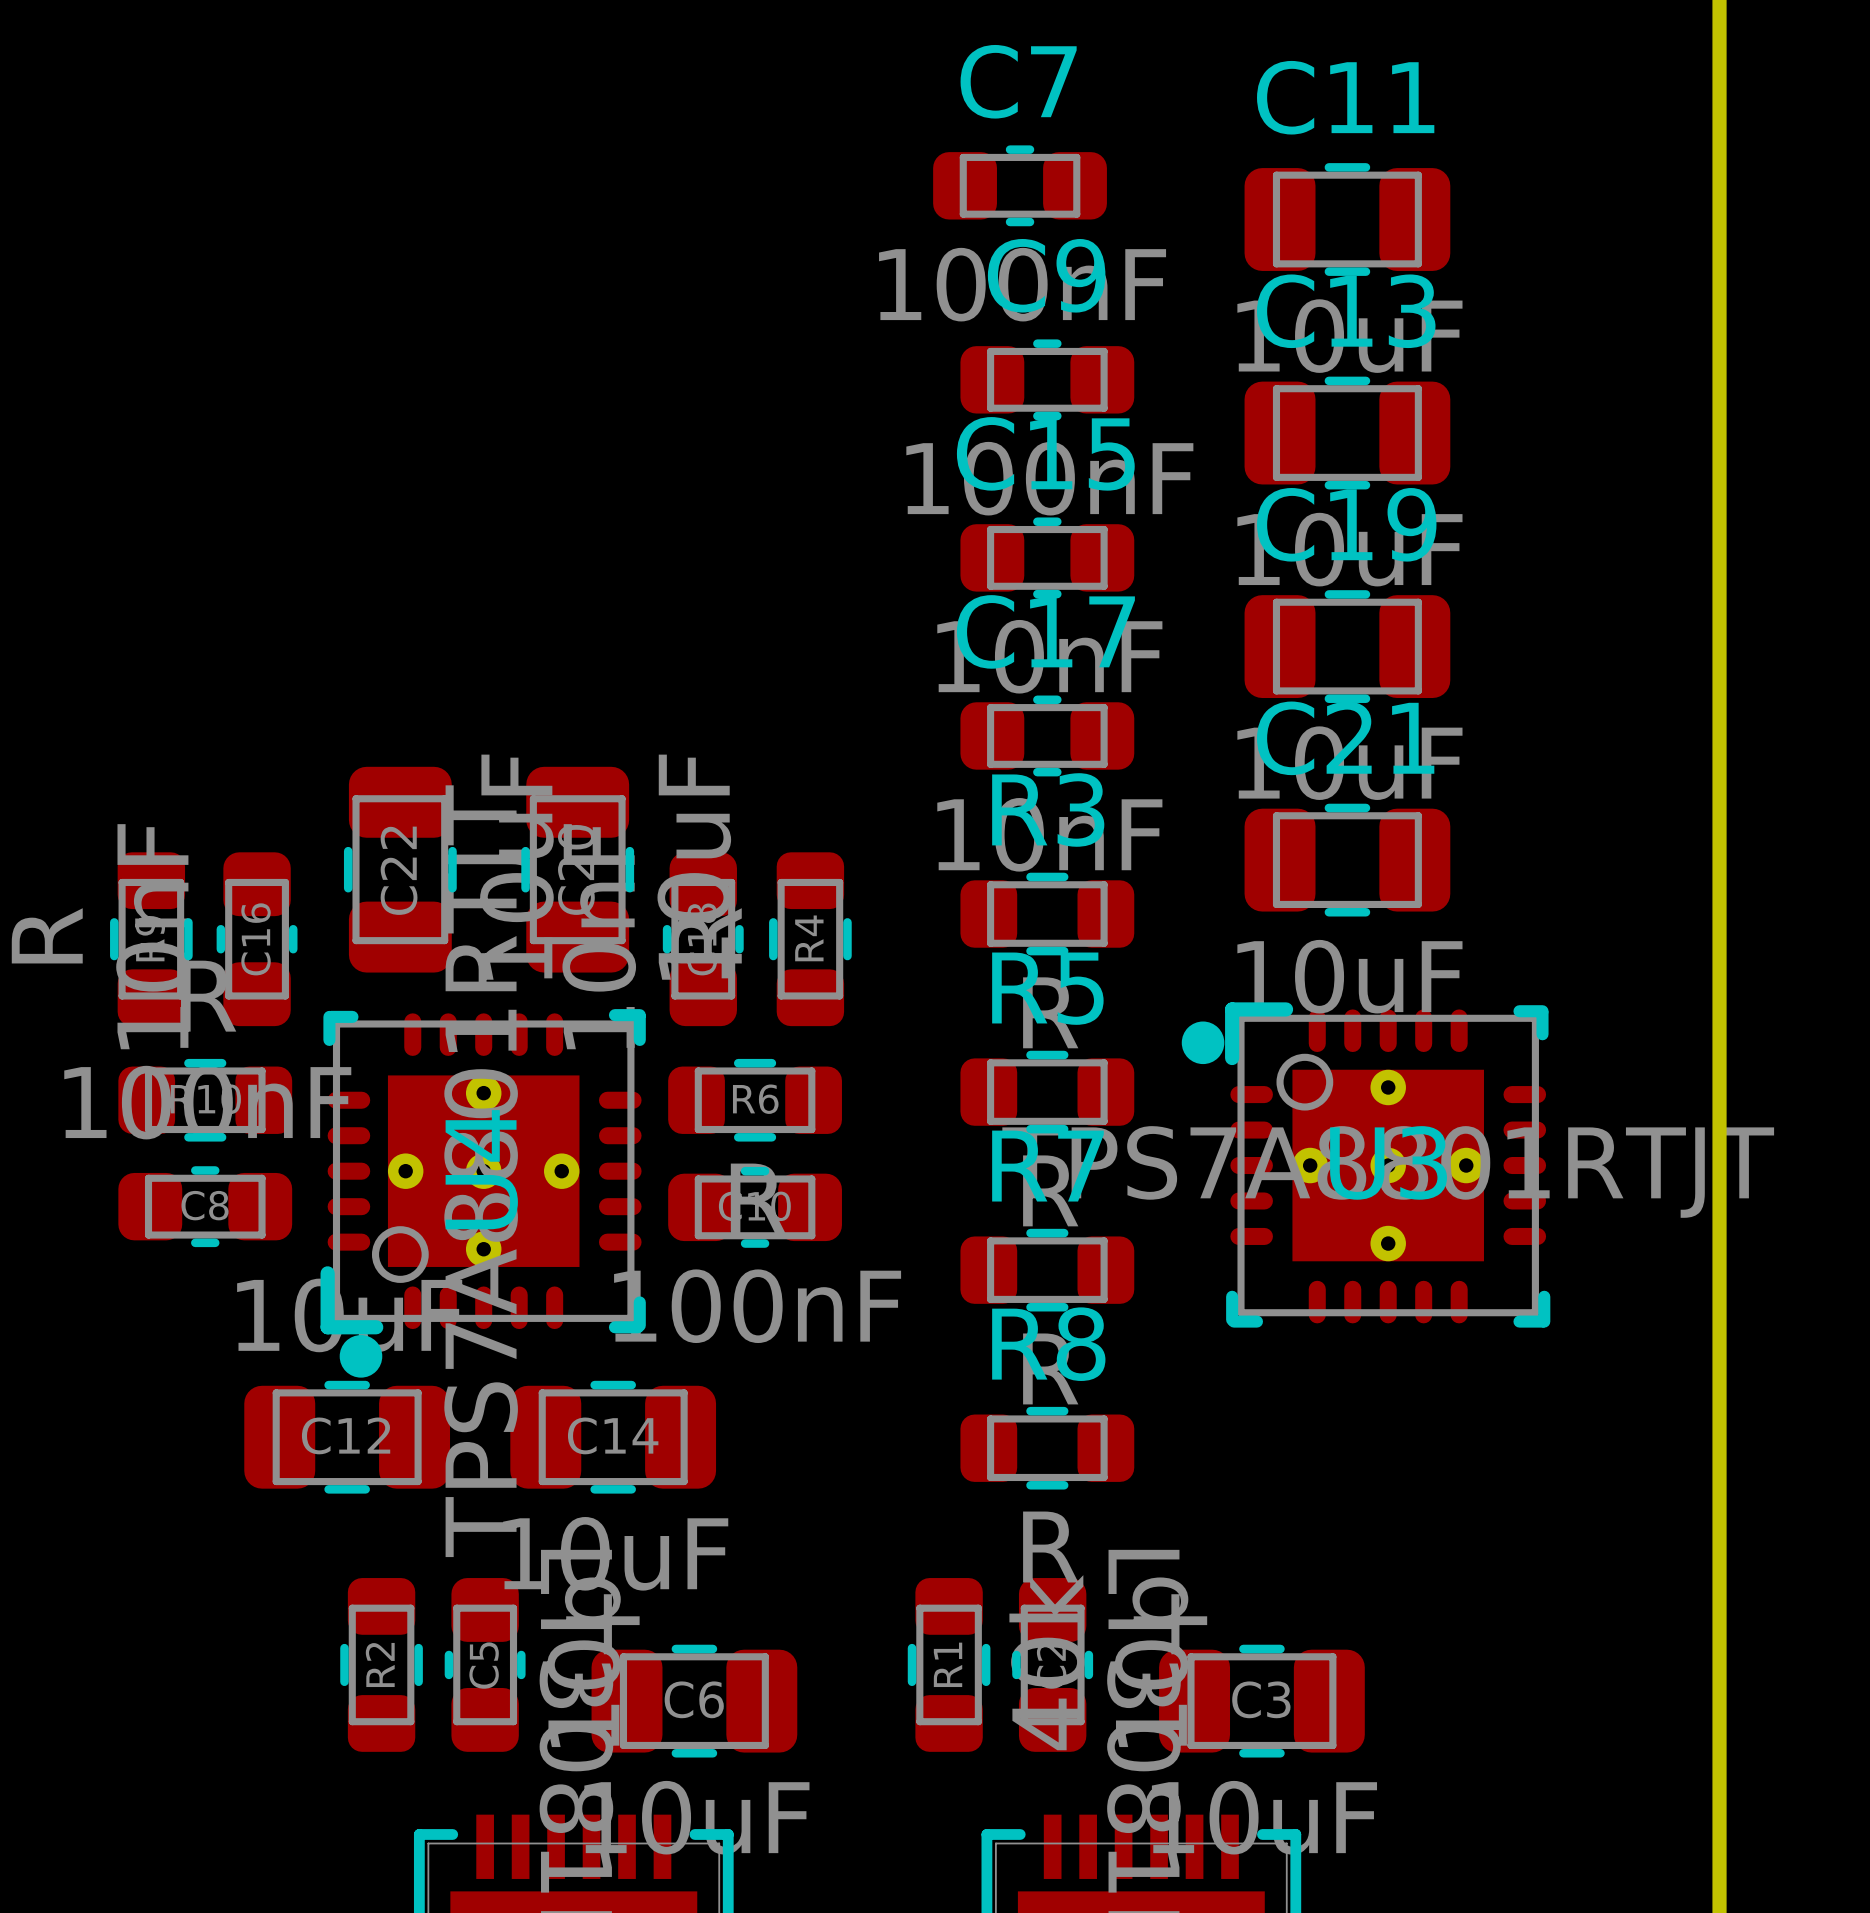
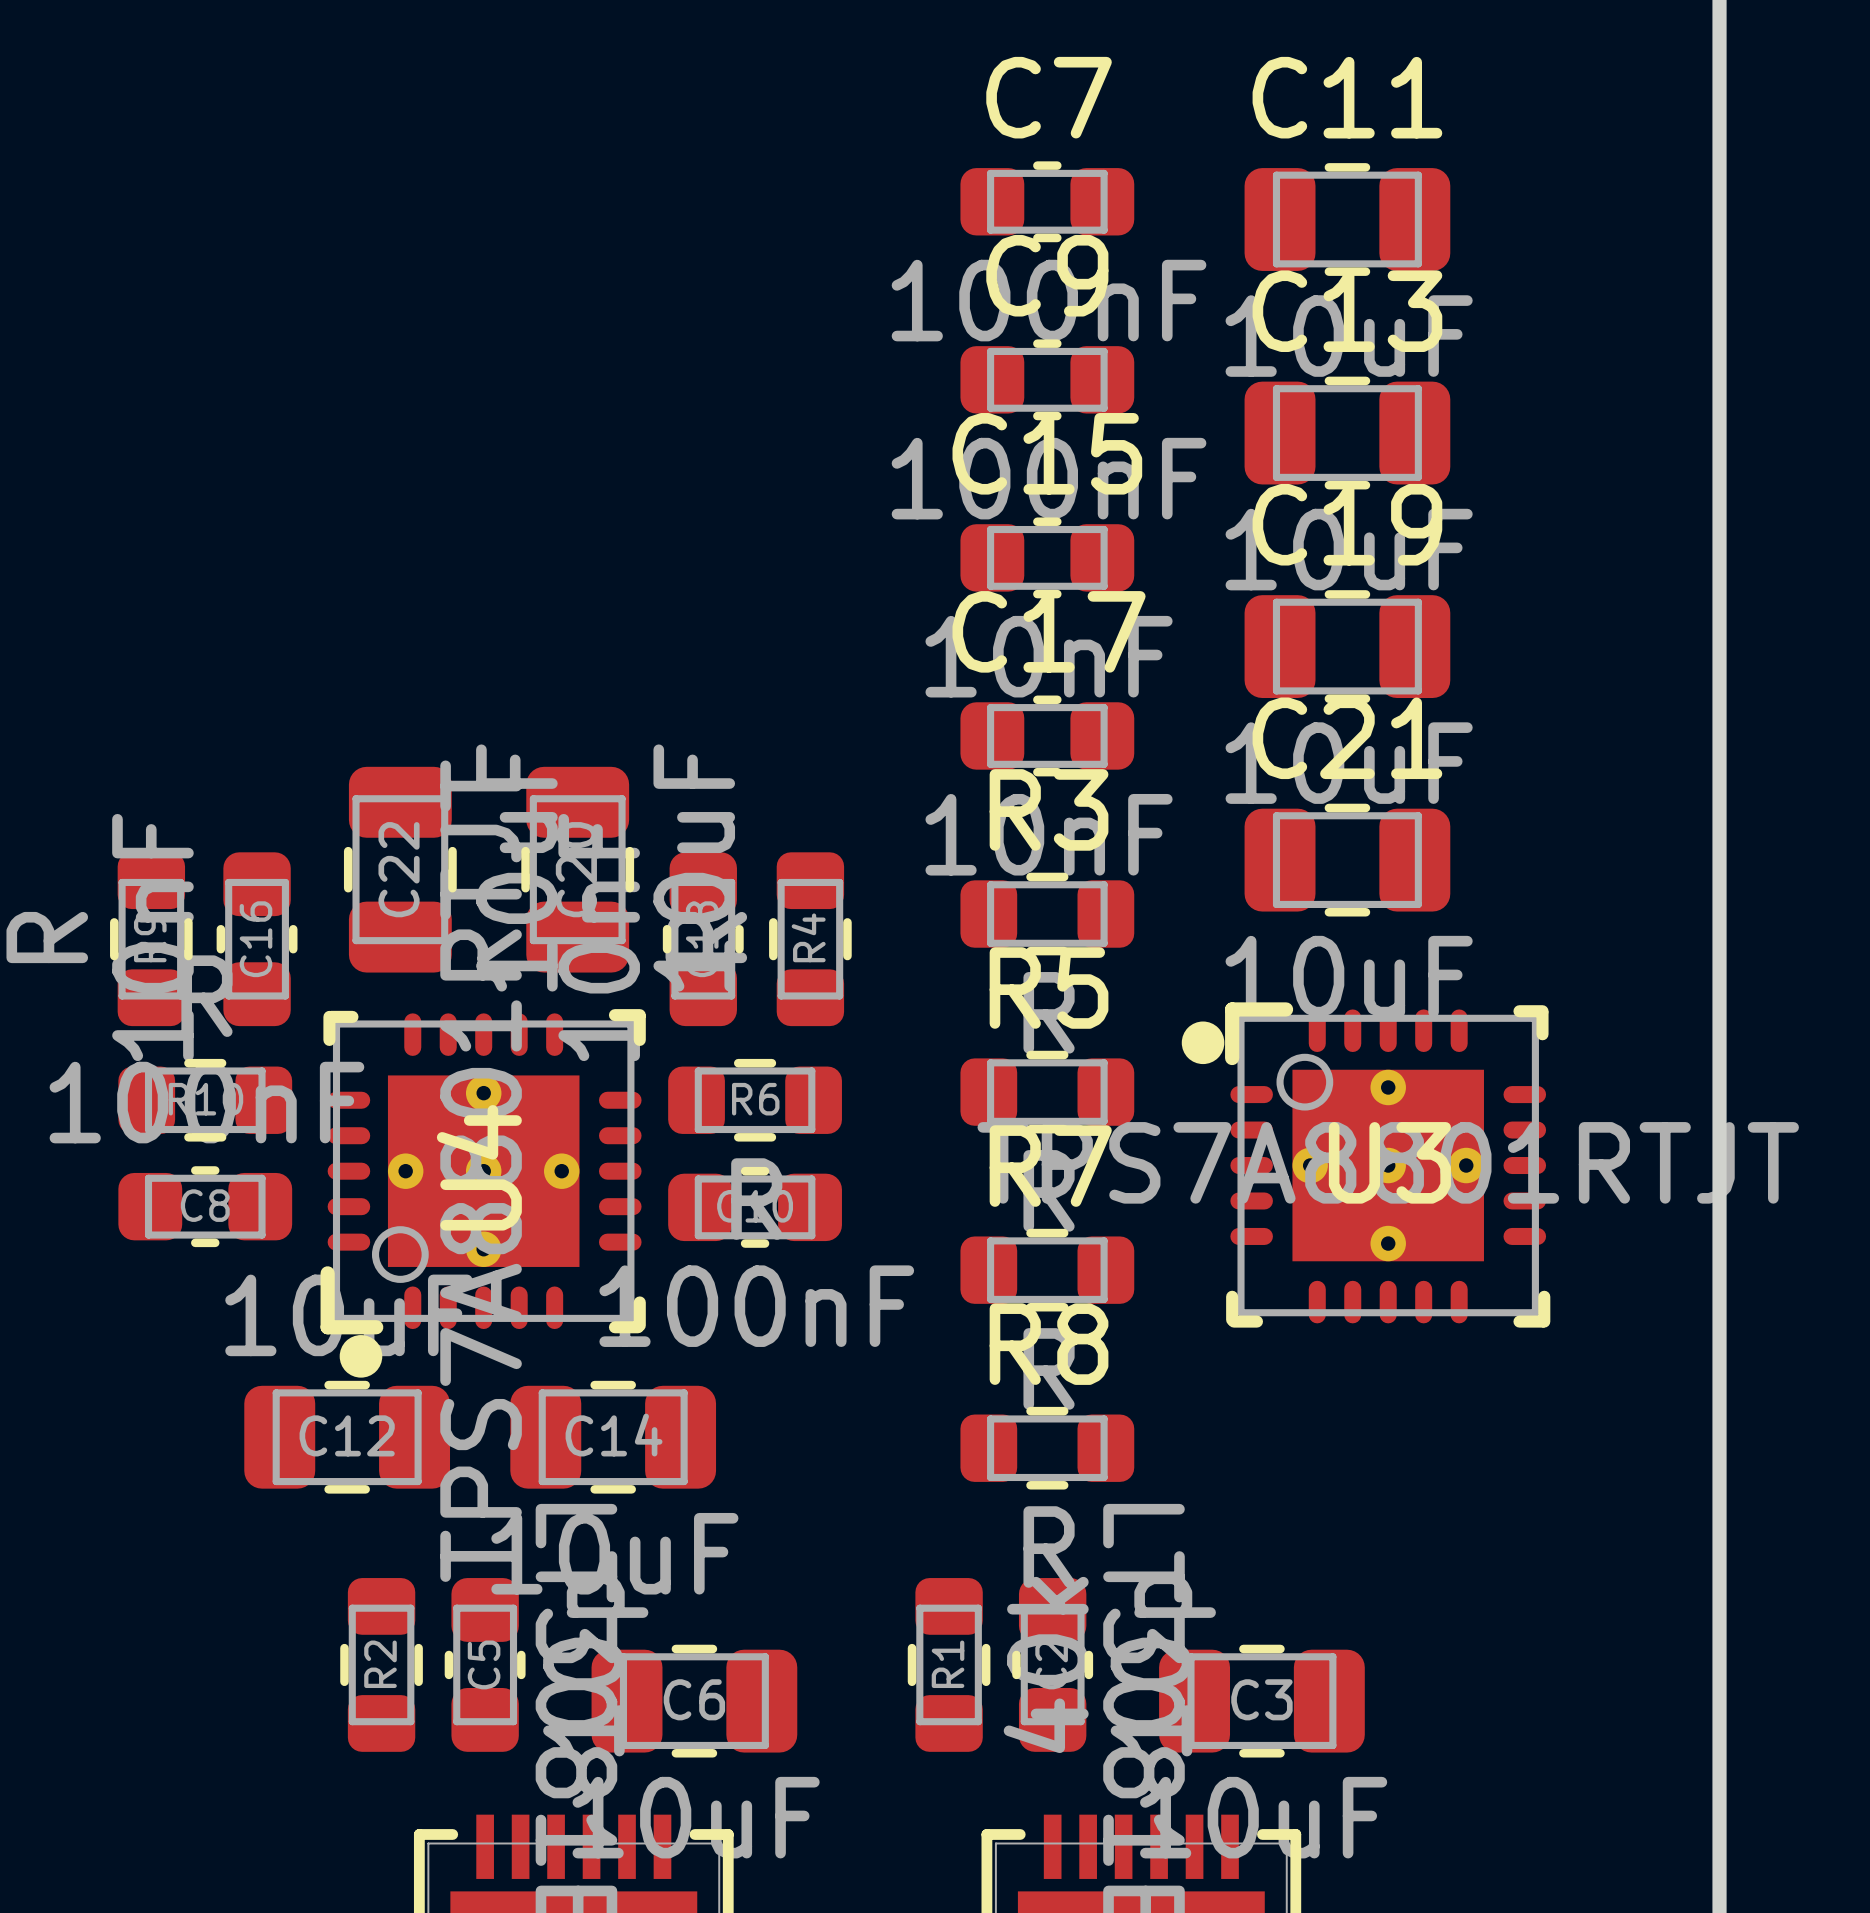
C7 position: (1020, 185) -> (1047, 201)

